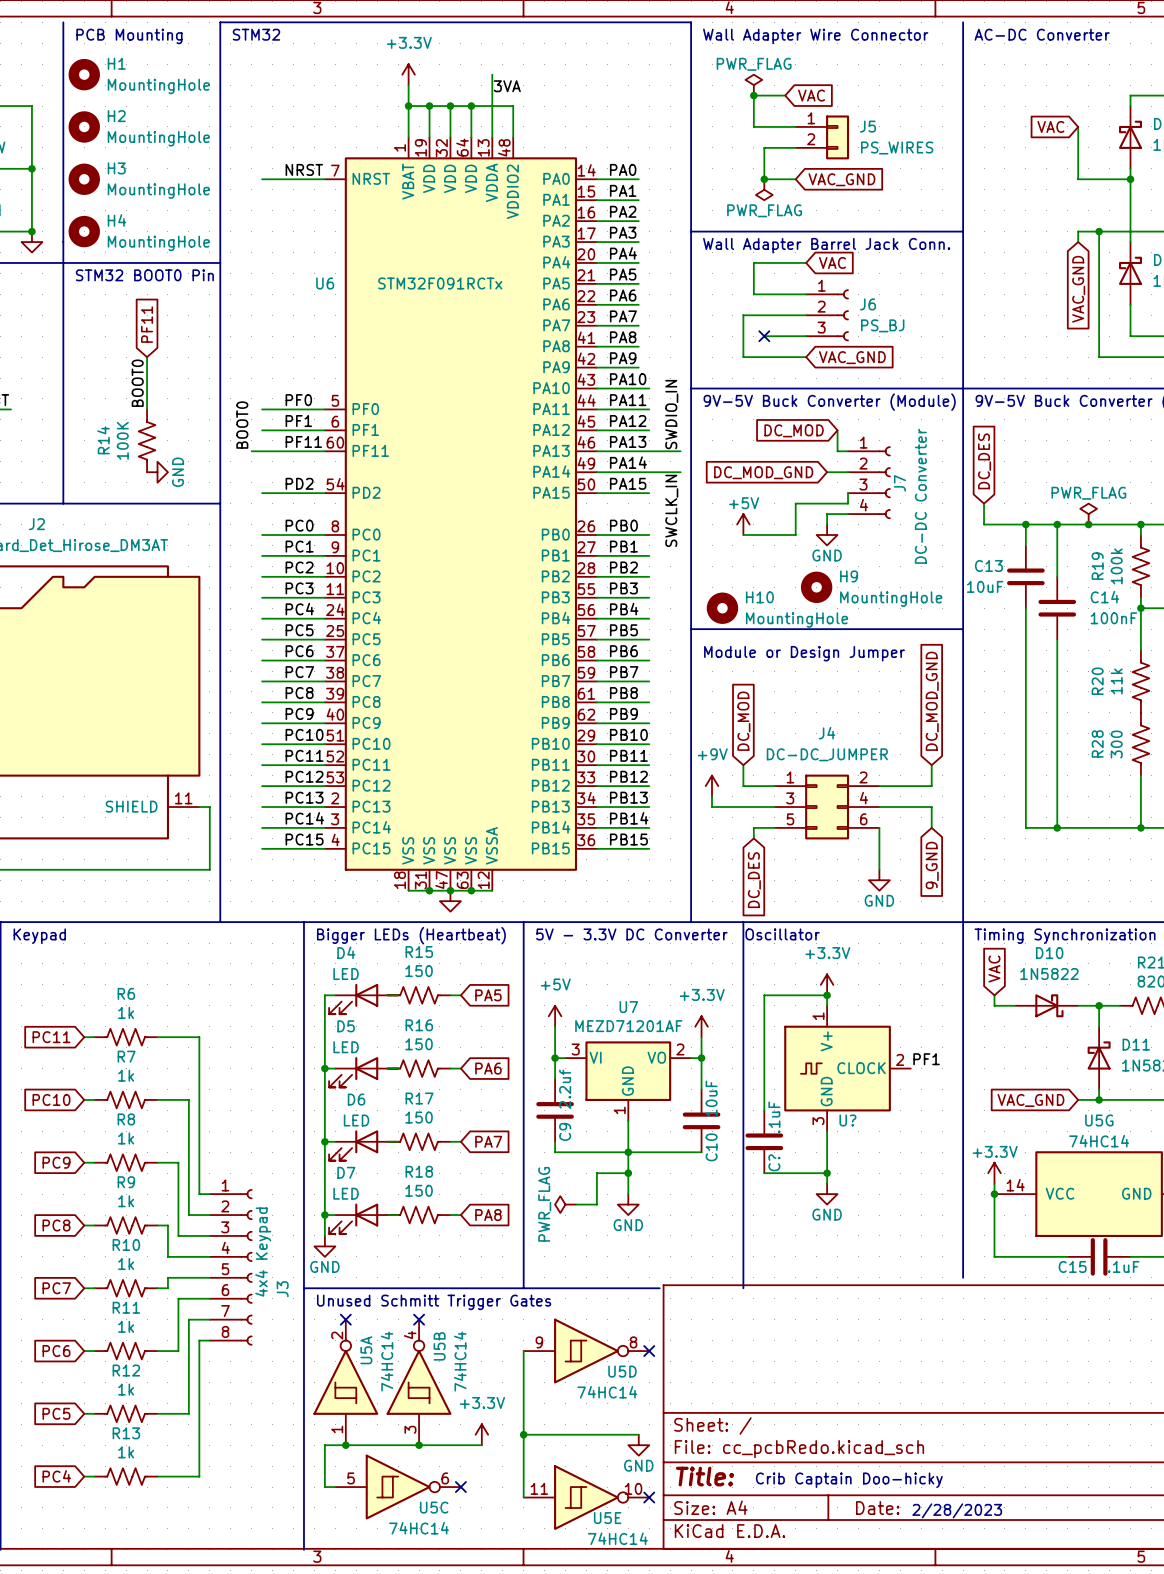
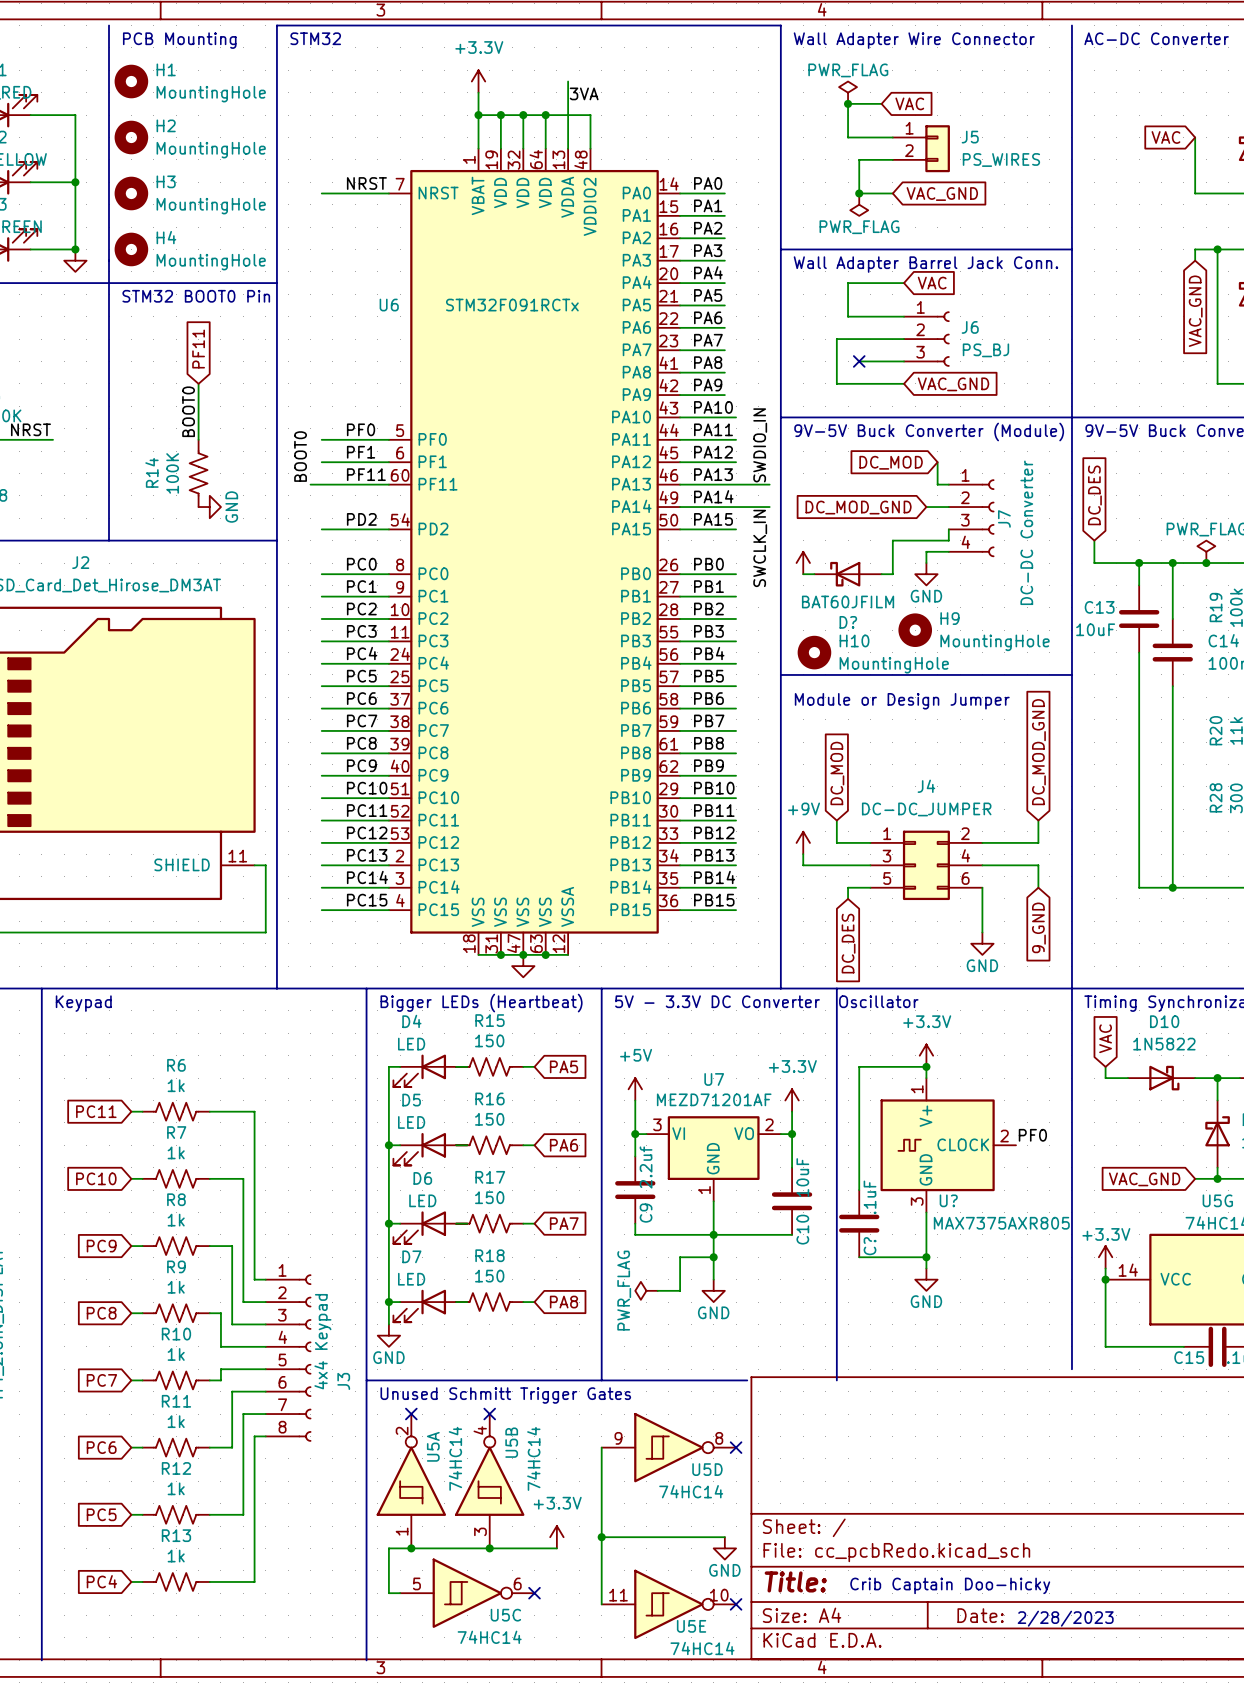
power symbol: none -> (803, 563)
power symbol: +5V (743, 524) -> none
wire: none -> (803, 574) (814, 574)
D?: none -> BAT60JFILM (848, 574)
label: PF1 (926, 1059) -> PF0 (1032, 1135)
U? value: none -> MAX7375AXR805 (1001, 1223)

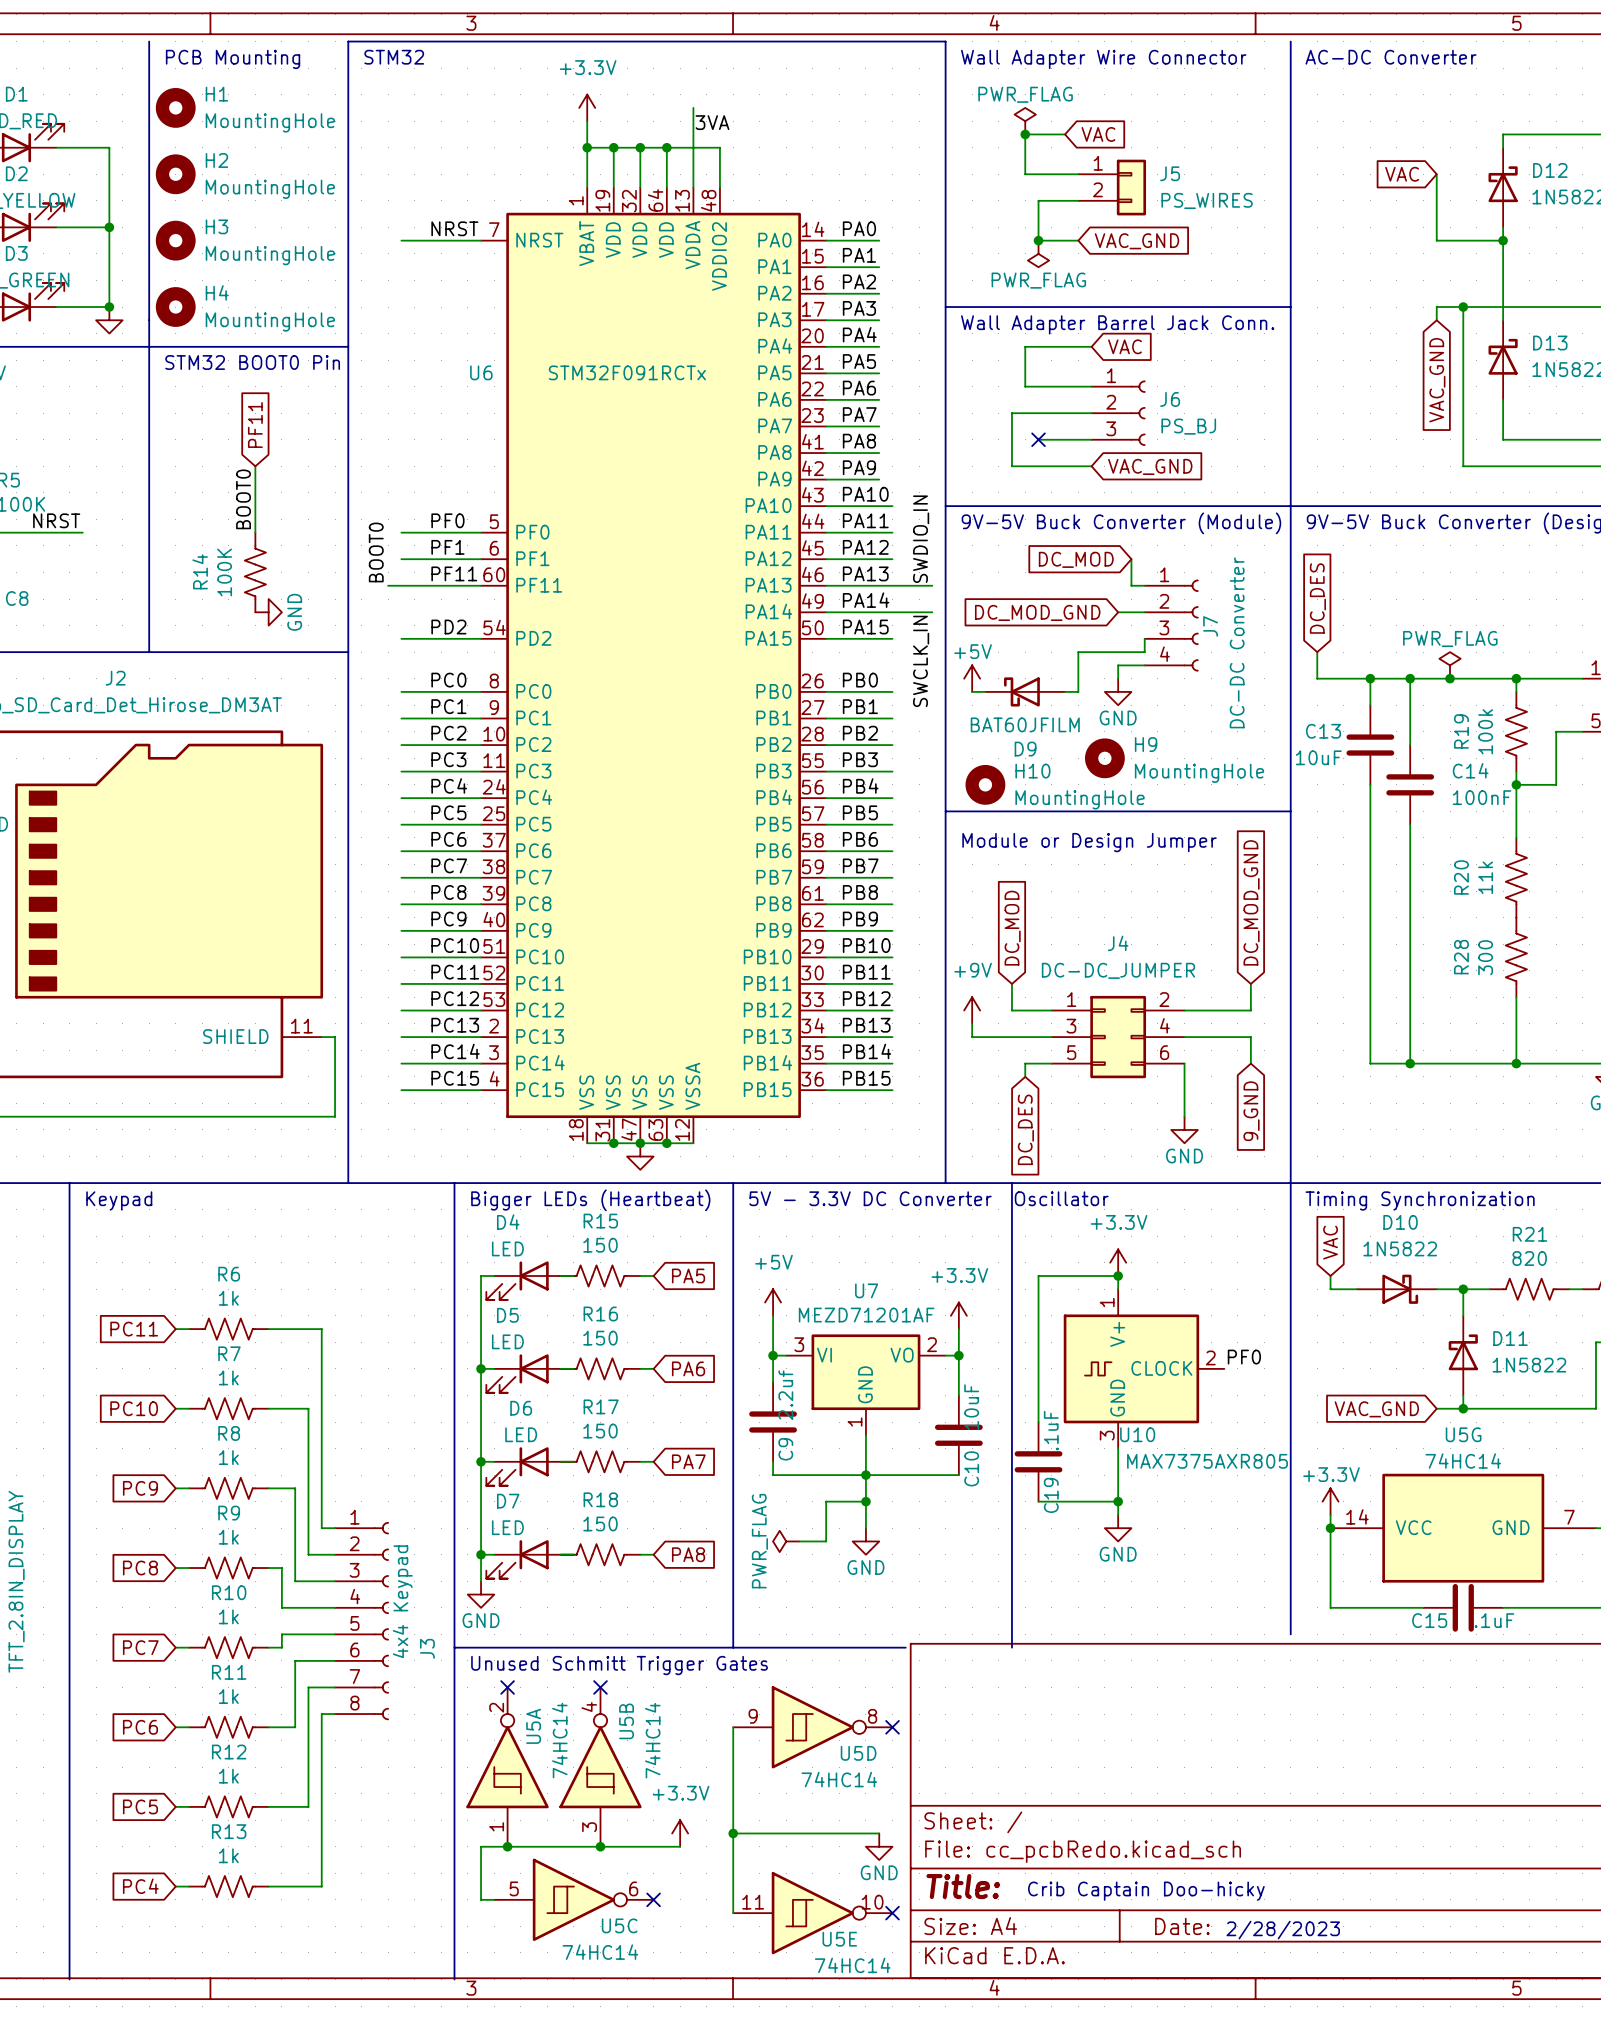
power symbol text: none -> +5V (973, 651)
D? name: D? (848, 622) -> D9 (1025, 749)
U? name: U? (948, 1200) -> U10 (1137, 1434)
C? name: C? (870, 1246) -> C19 (1051, 1495)

